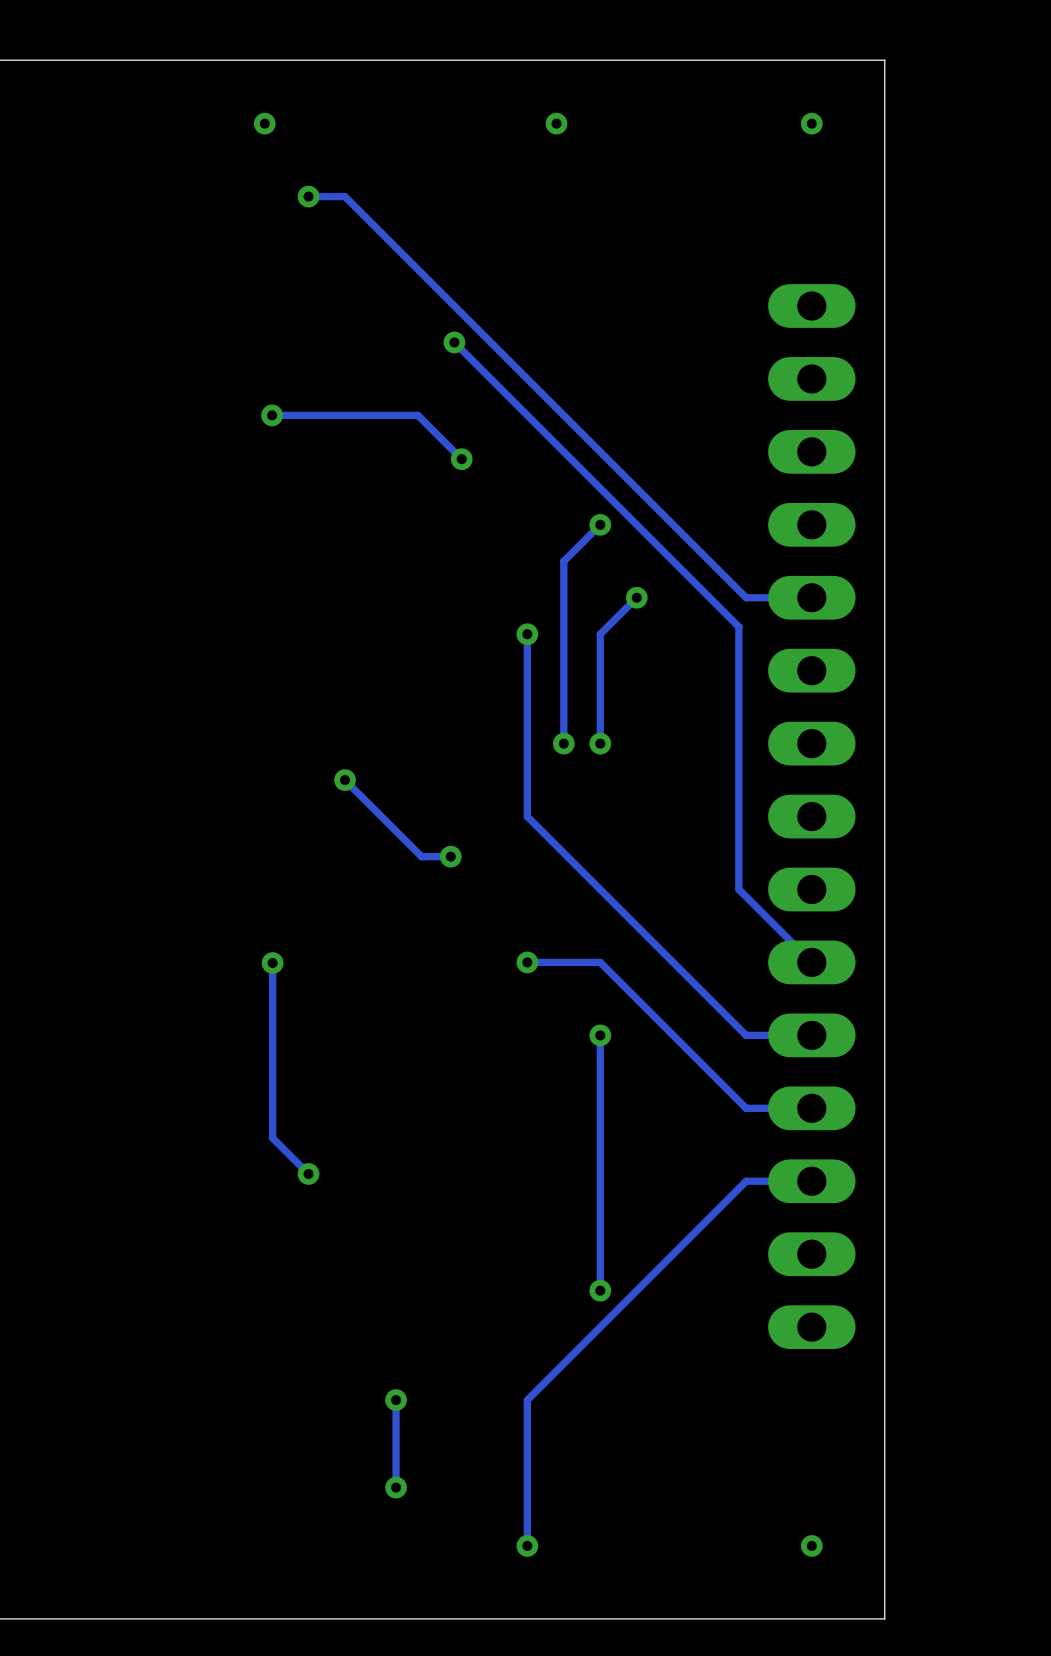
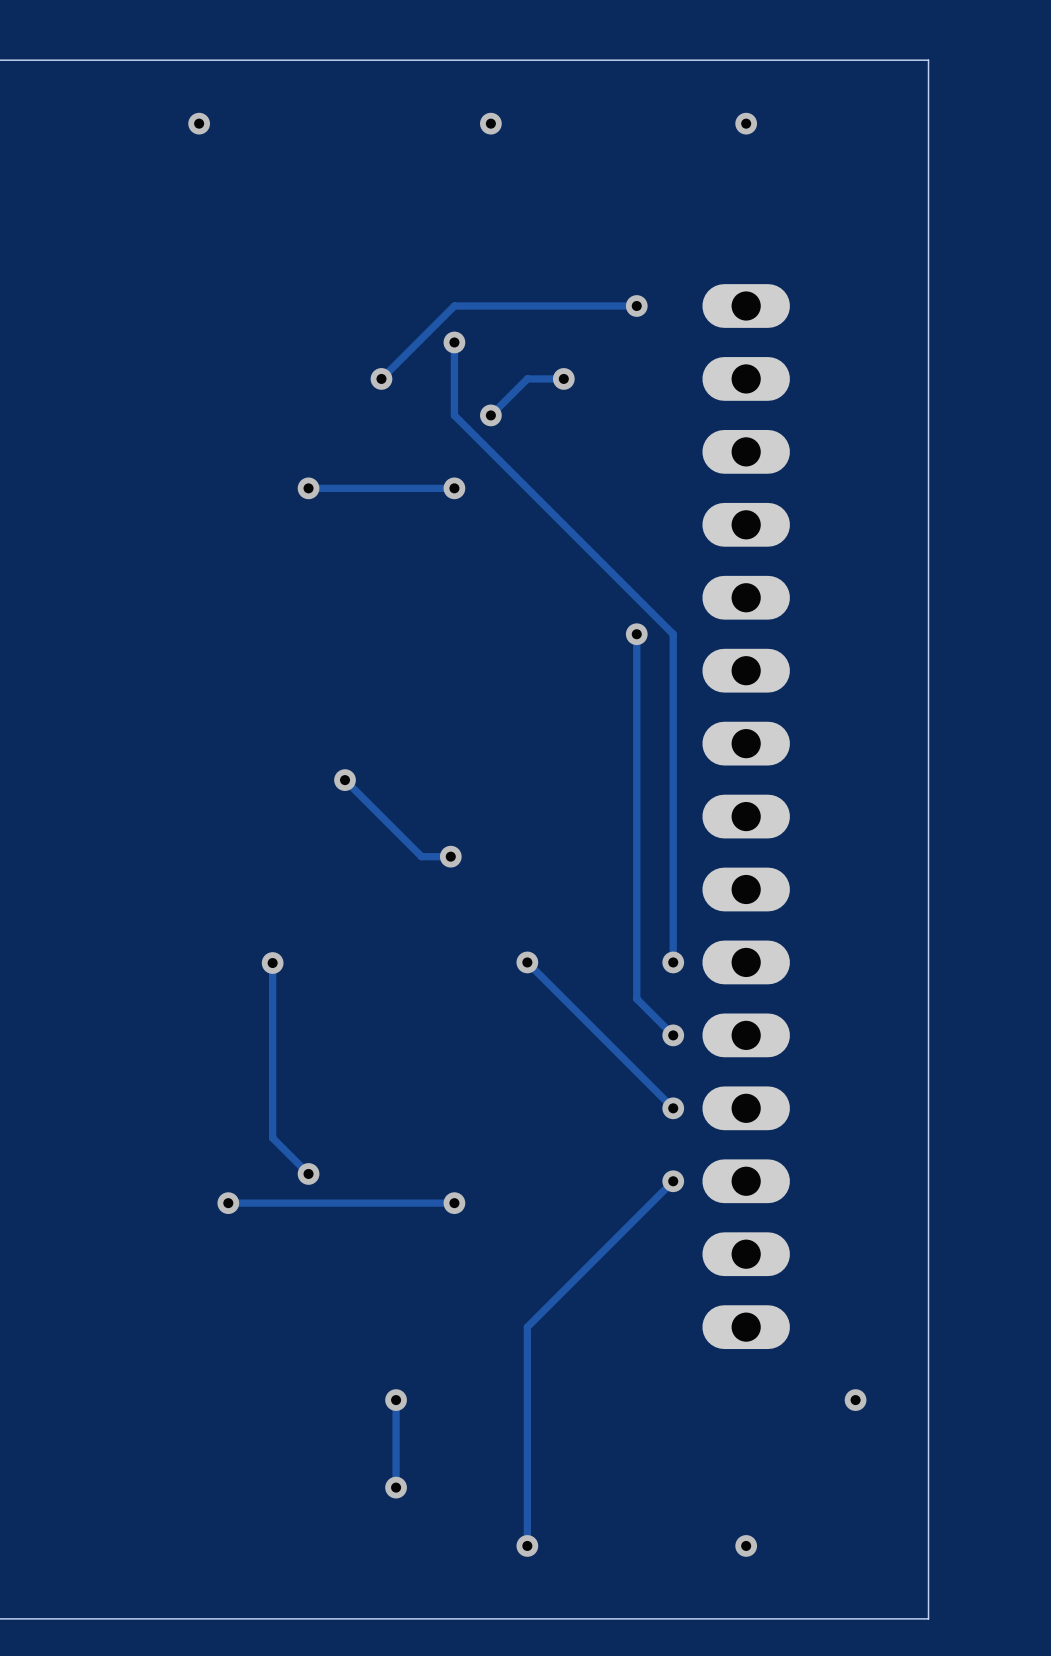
board edge: (884, 60) (884, 1618) -> (884, 60) (928, 60) (928, 1618) (884, 1618)
via: none -> (199, 123)
via: (264, 123) -> none
via position: (556, 123) -> (490, 123)
via position: (811, 123) -> (746, 123)
track: (308, 196) (345, 196) (746, 597) (811, 597) -> none
via: (308, 196) -> none
track: none -> (636, 306) (454, 306) (381, 378)
via: none -> (636, 306)
track: (454, 342) (738, 626) (738, 889) (811, 962) -> (454, 342) (454, 415) (673, 634) (673, 962)
via: none -> (381, 378)
track: none -> (563, 378) (527, 378) (490, 415)
via: none -> (563, 378)
track: (272, 415) (417, 415) (461, 459) -> none
via: (272, 415) -> none
via: none -> (490, 415)
via: (461, 459) -> none
via: none -> (308, 488)
track: none -> (454, 488) (308, 488)
via: none -> (454, 488)
track: (600, 524) (563, 561) (563, 743) -> none
via: (600, 524) -> none
track: (636, 597) (600, 634) (600, 743) -> none
via position: (636, 597) -> (636, 634)
track: (527, 634) (527, 816) (746, 1035) (811, 1035) -> none
via: (527, 634) -> none
track: none -> (636, 634) (636, 998)
via: (563, 743) -> none
via: (600, 743) -> none
part position: (811, 816) -> (746, 816)
track: (527, 962) (600, 962) (636, 998) -> (527, 962) (673, 1108)
via: none -> (673, 962)
track: (600, 1035) (600, 1290) -> none
via: (600, 1035) -> none
track: (673, 1035) (746, 1108) (811, 1108) -> none
via: none -> (673, 1035)
via: none -> (673, 1108)
via: none -> (673, 1181)
track: (811, 1181) (746, 1181) (527, 1400) -> (673, 1181) (527, 1327) (527, 1400)
via: none -> (228, 1203)
track: none -> (454, 1203) (228, 1203)
via: none -> (454, 1203)
via: (600, 1290) -> none
via: none -> (855, 1400)
via position: (811, 1545) -> (746, 1545)

